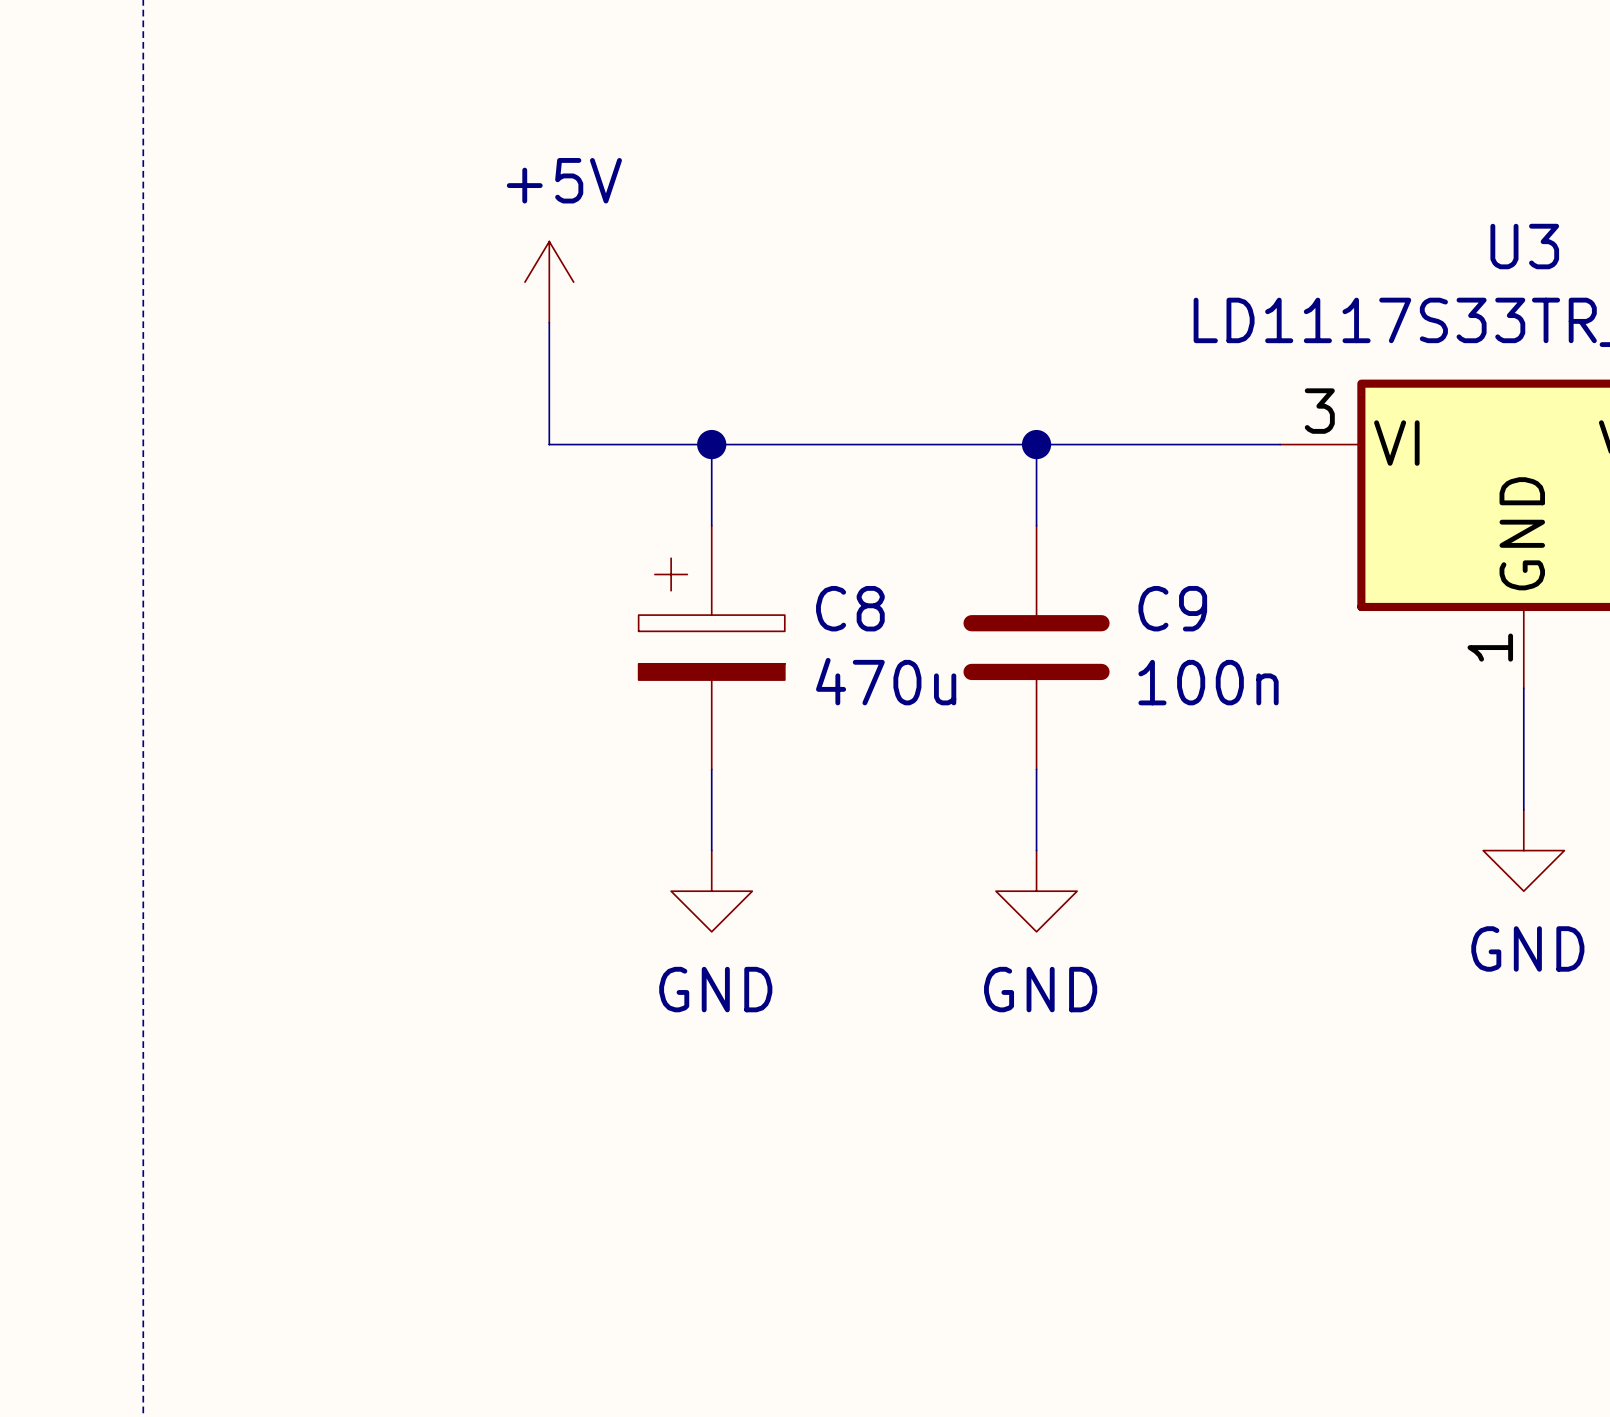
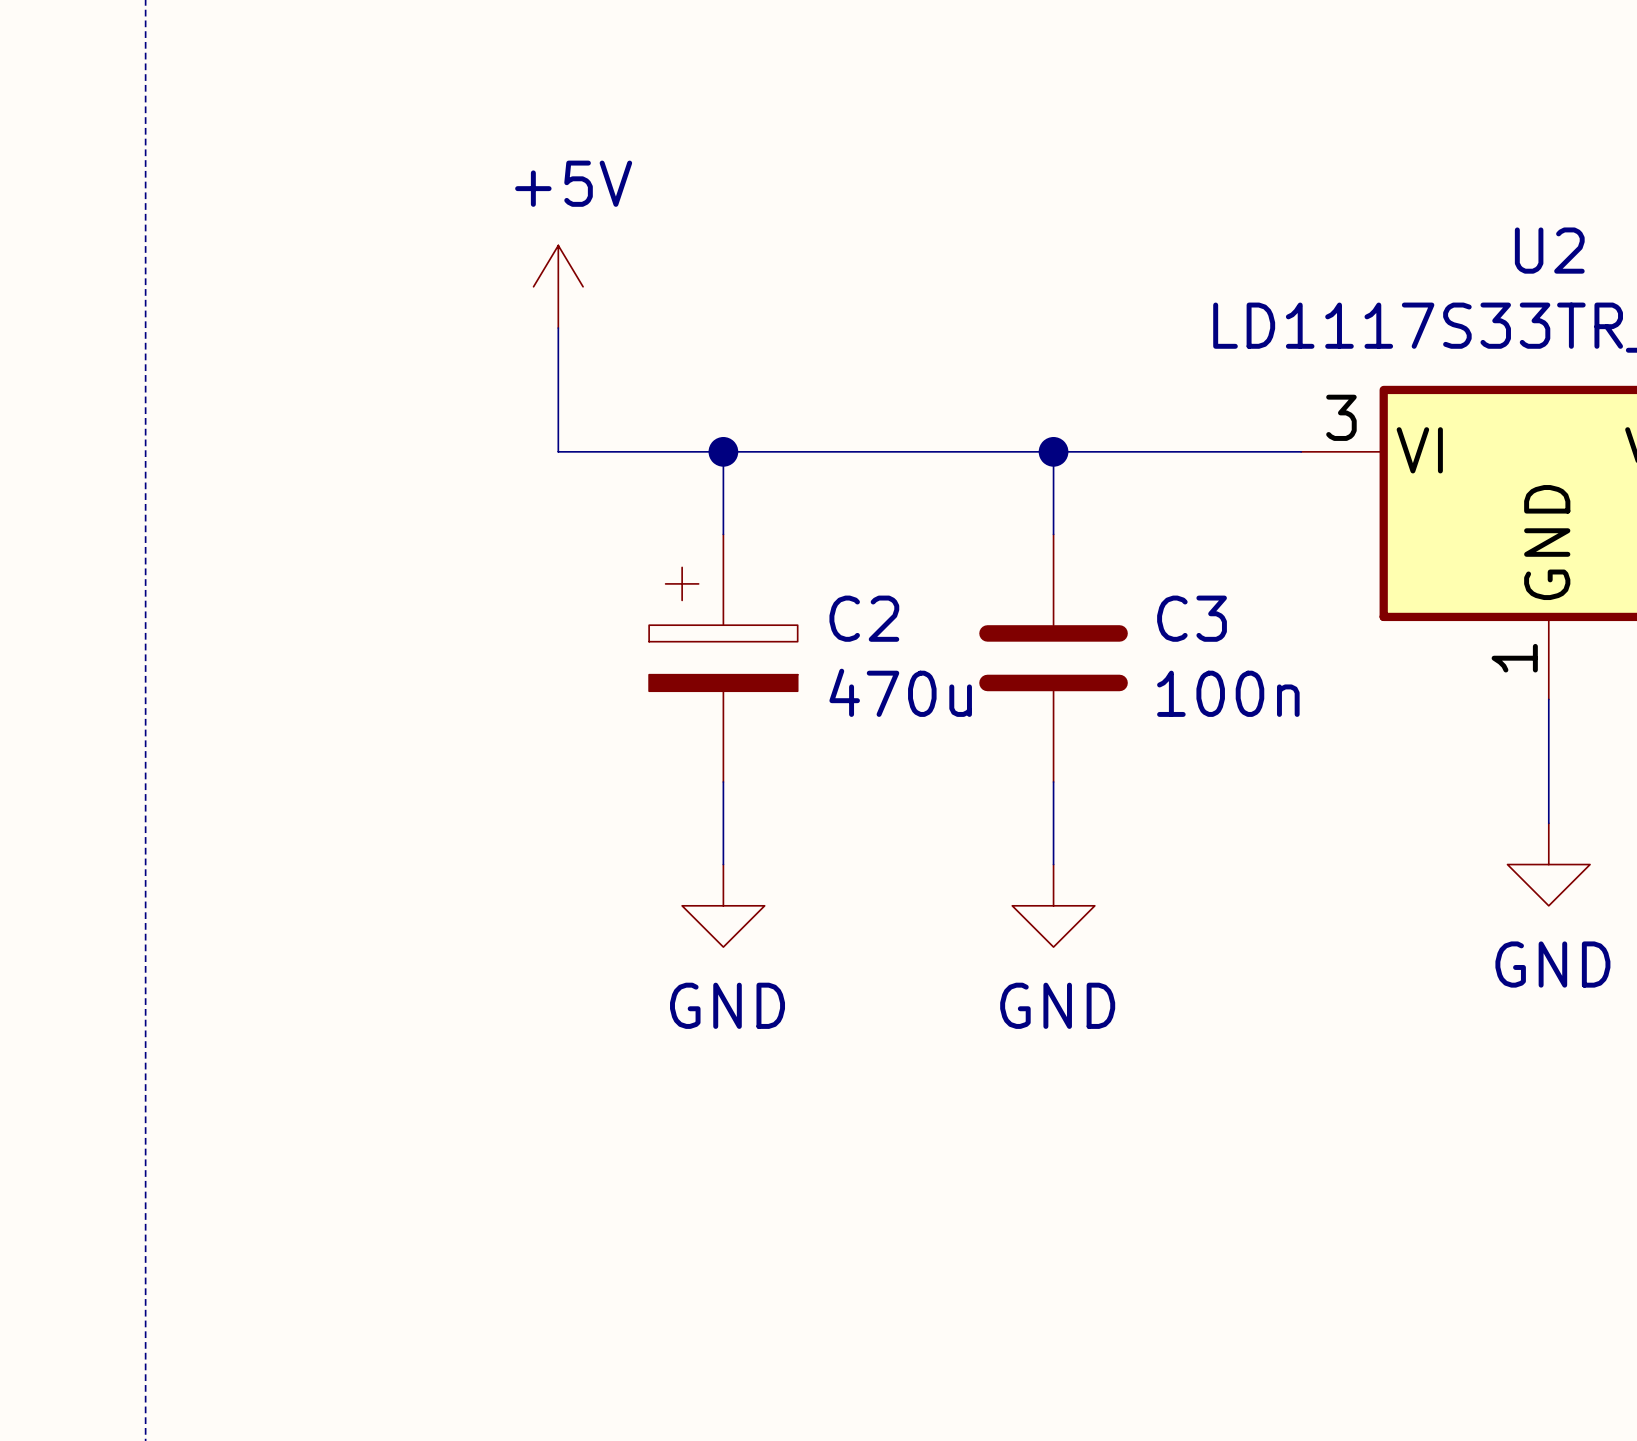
U3 name: U3 (1524, 246) -> U2 (1549, 250)
C8 name: C8 (850, 608) -> C2 (864, 618)
C9 name: C9 (1172, 608) -> C3 (1192, 618)

